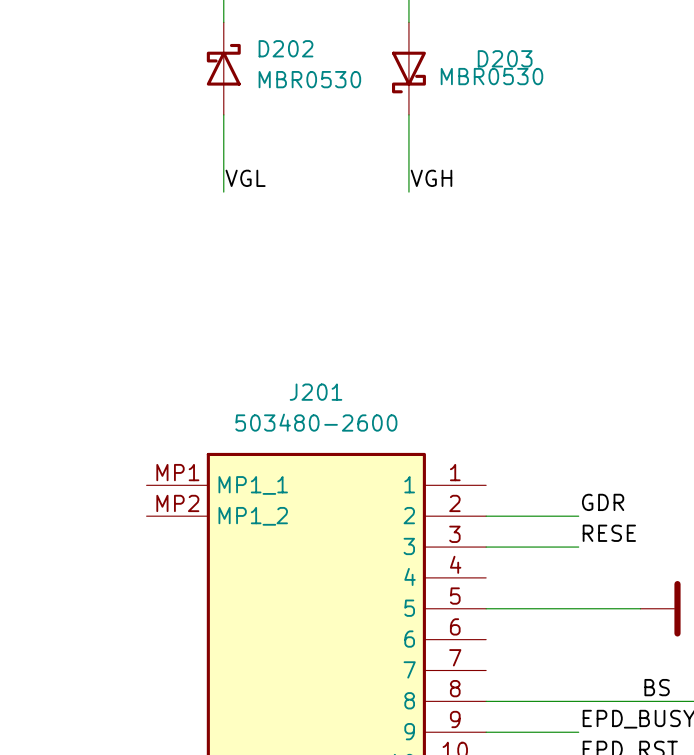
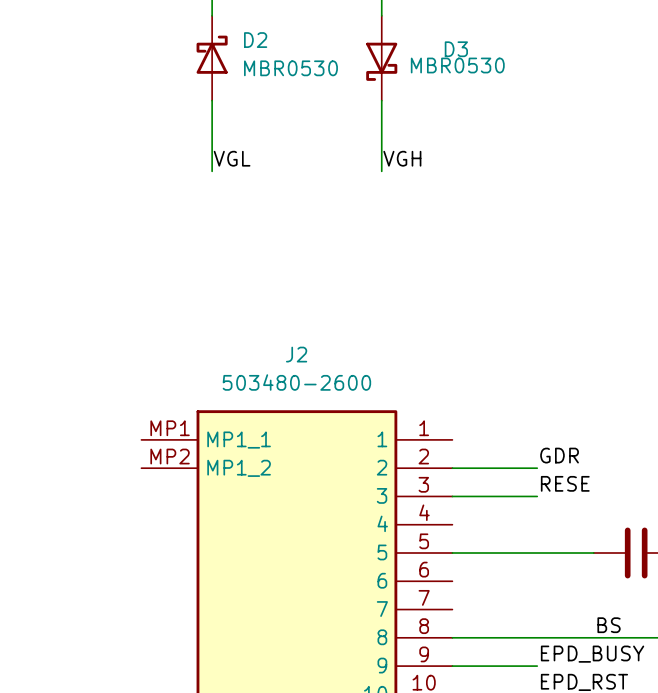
D202 name: D202 (285, 48) -> D2 (255, 40)
D203 name: D203 (505, 58) -> D3 (456, 49)
J201 name: J201 (316, 392) -> J2 (296, 354)

